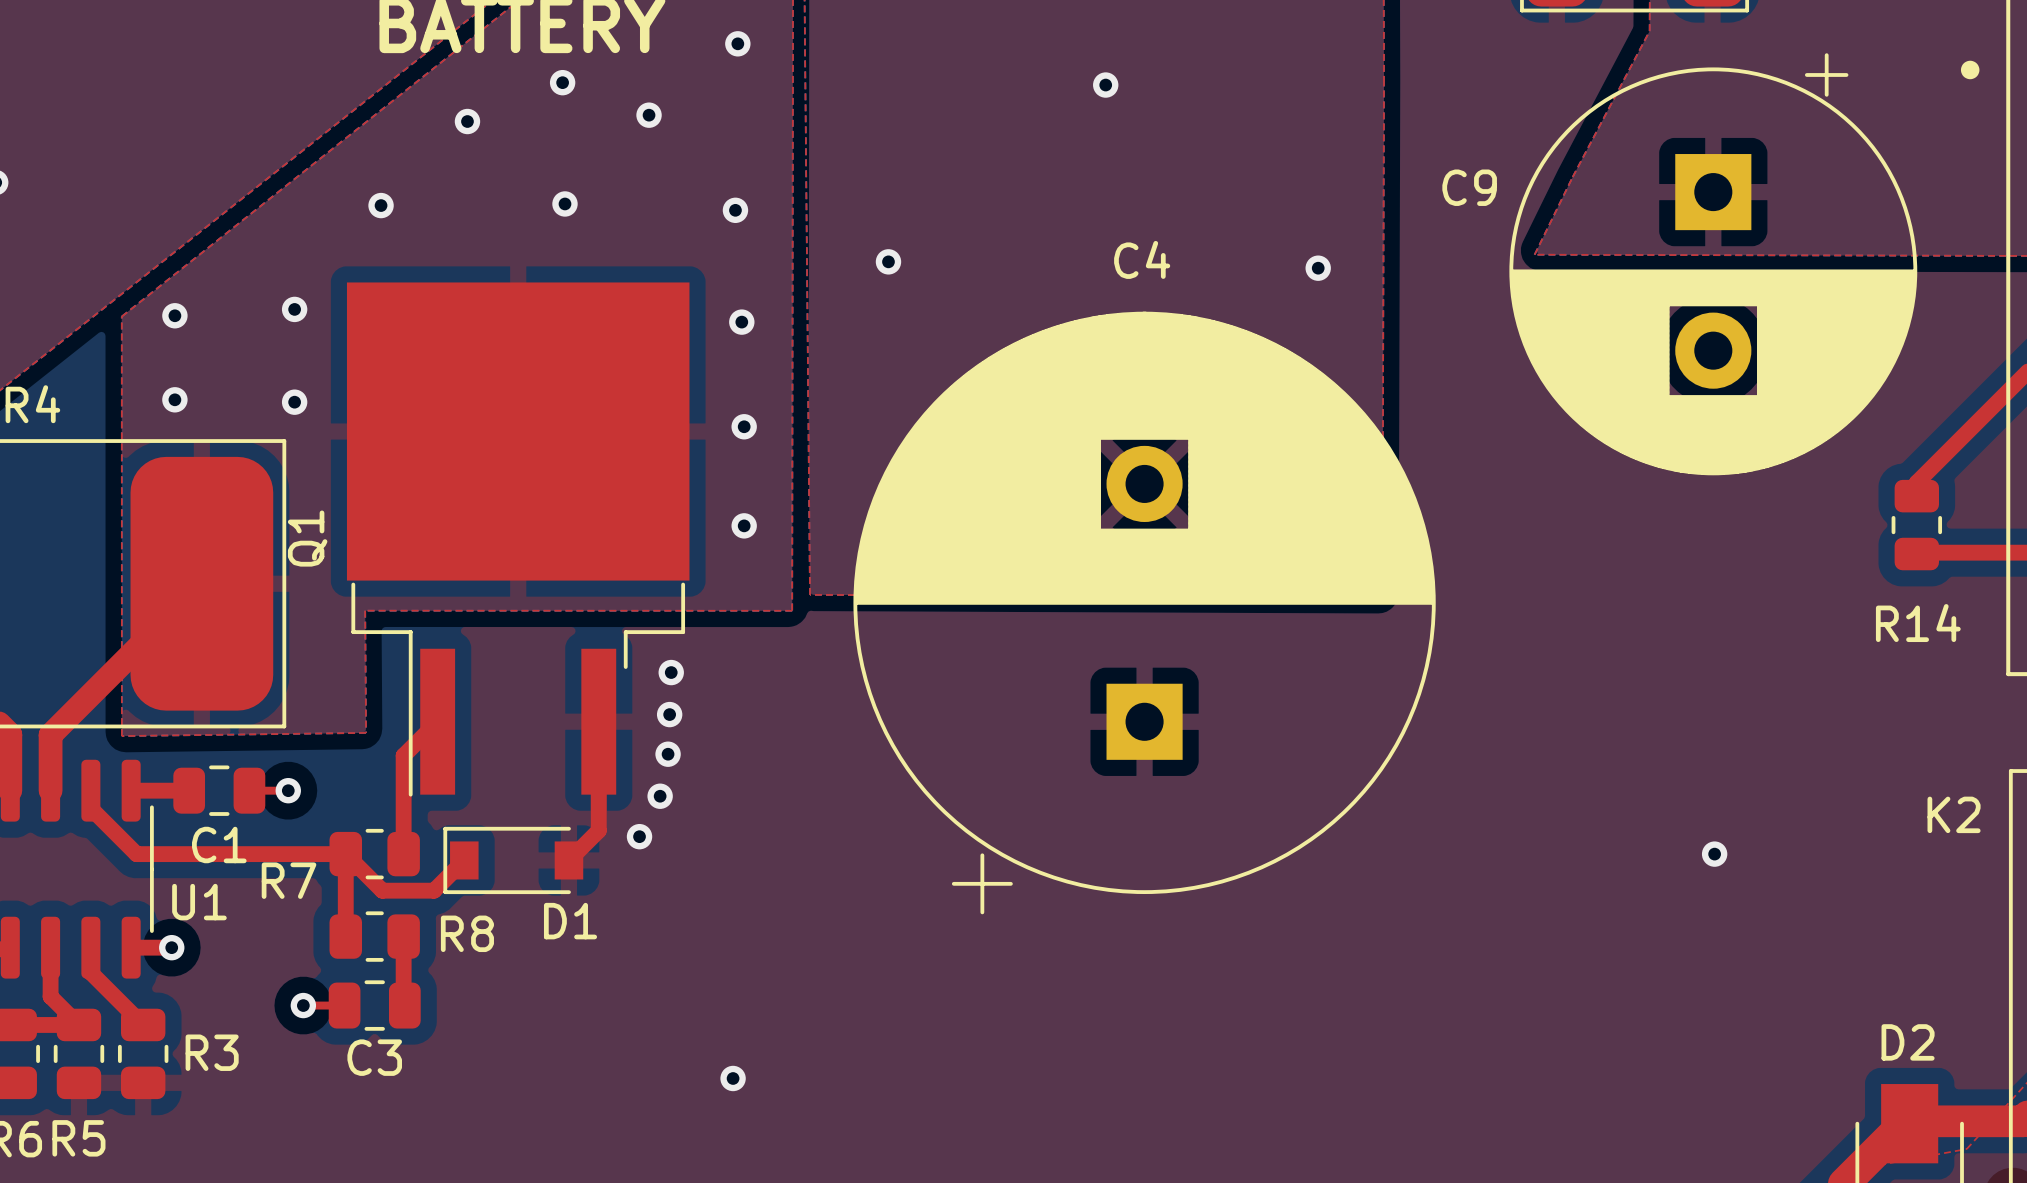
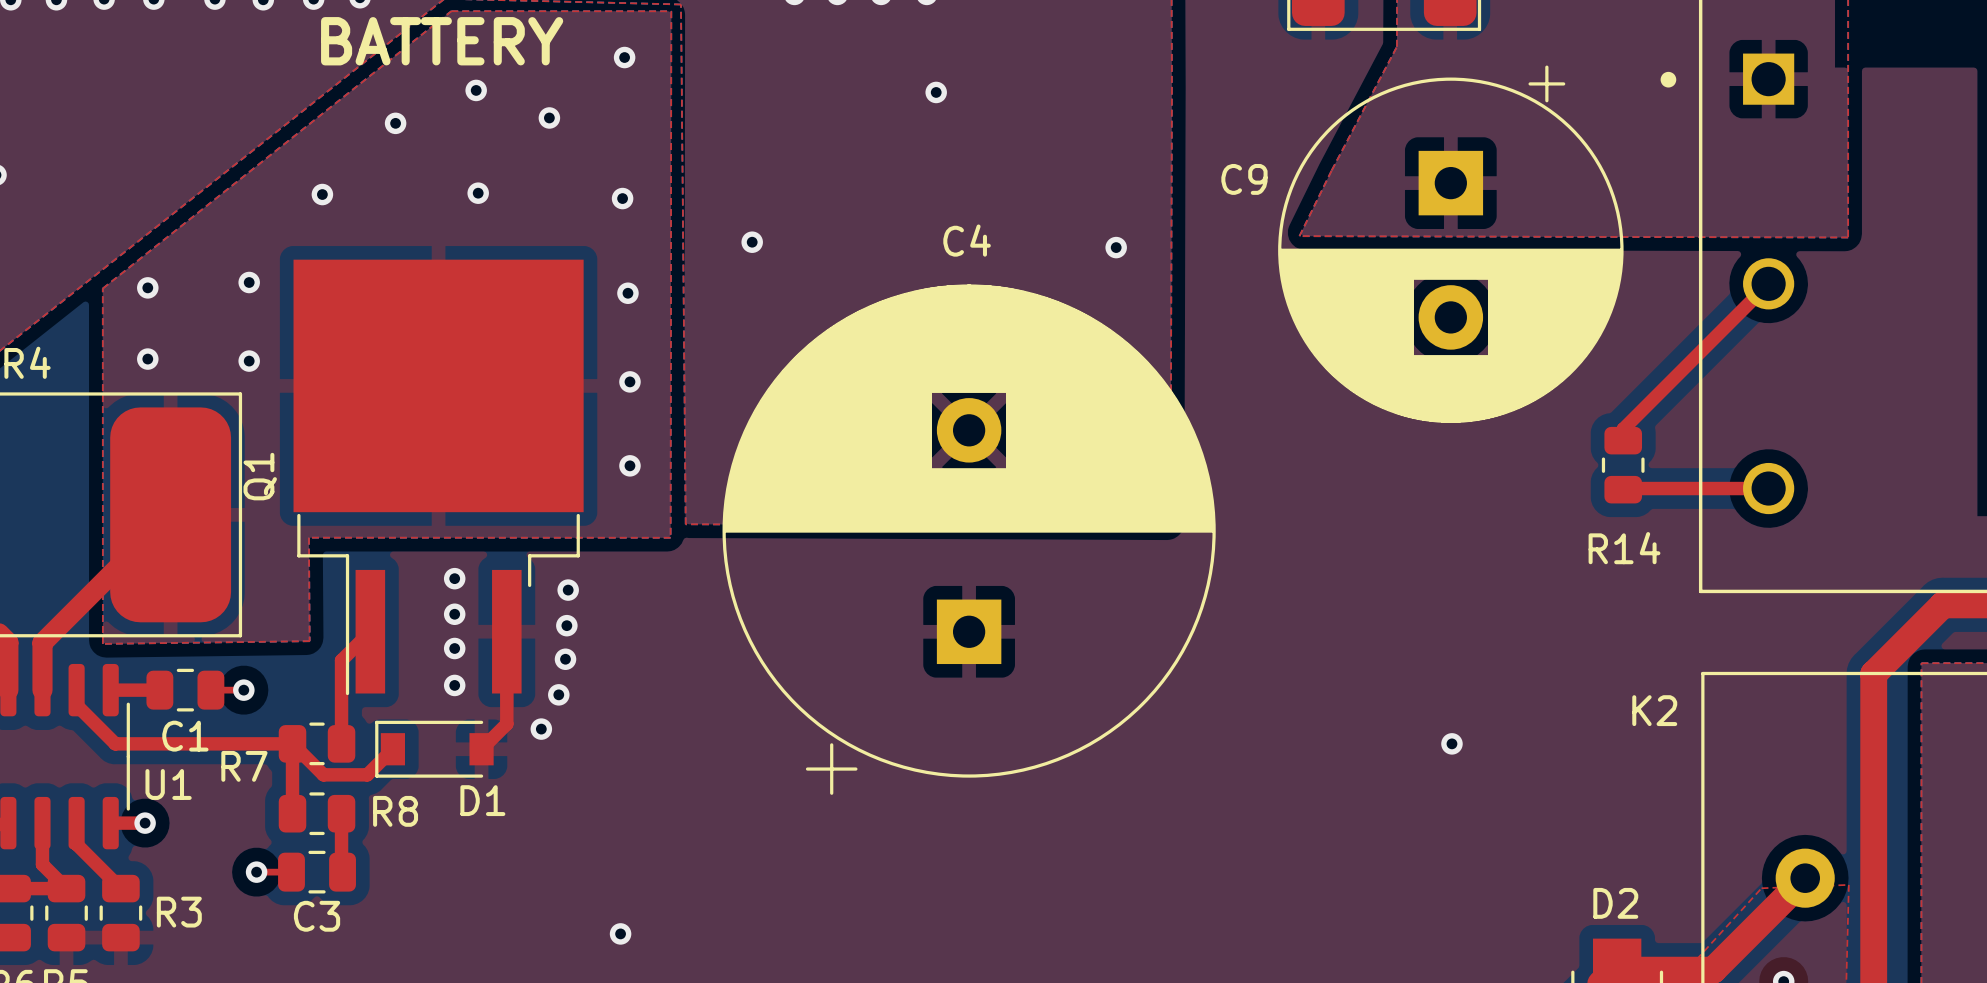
via: none -> (454, 578)
via: none -> (454, 614)
via: none -> (454, 648)
via: none -> (454, 685)

